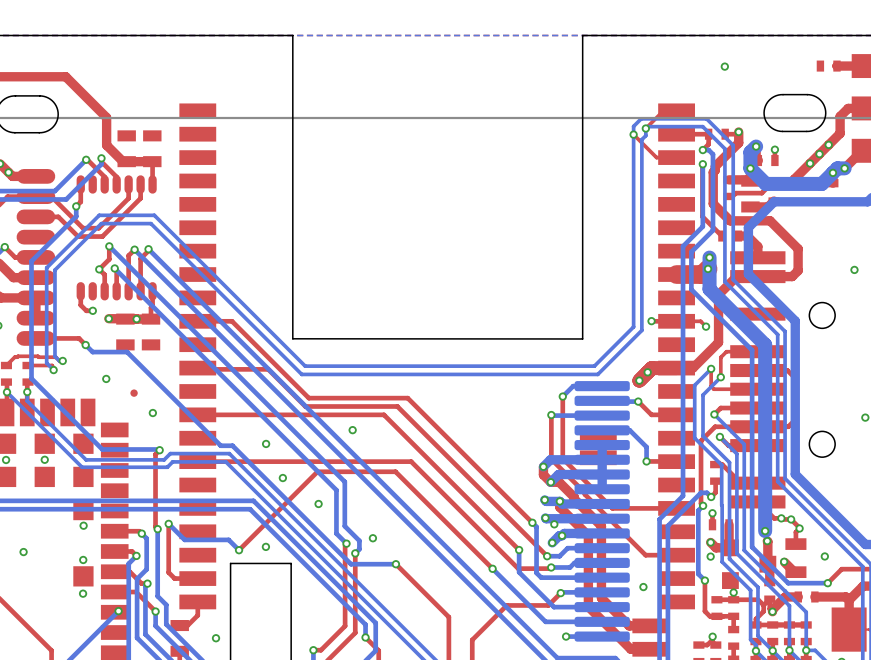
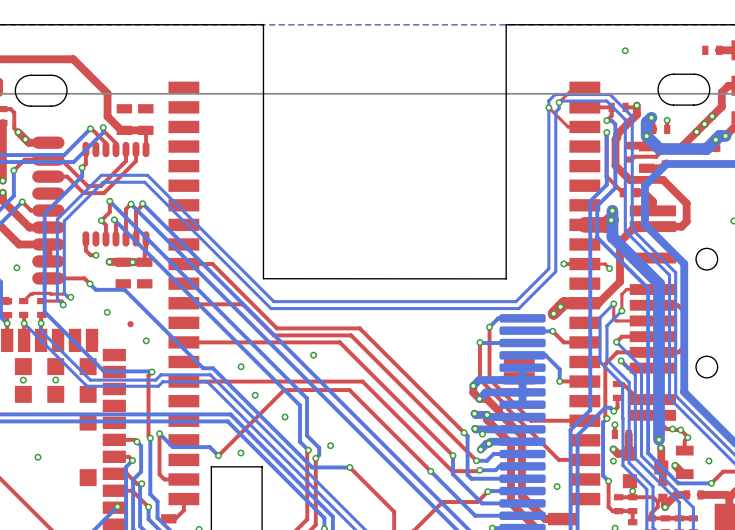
via: (83, 525) -> none
via: (83, 559) -> none
via: (83, 593) -> none

